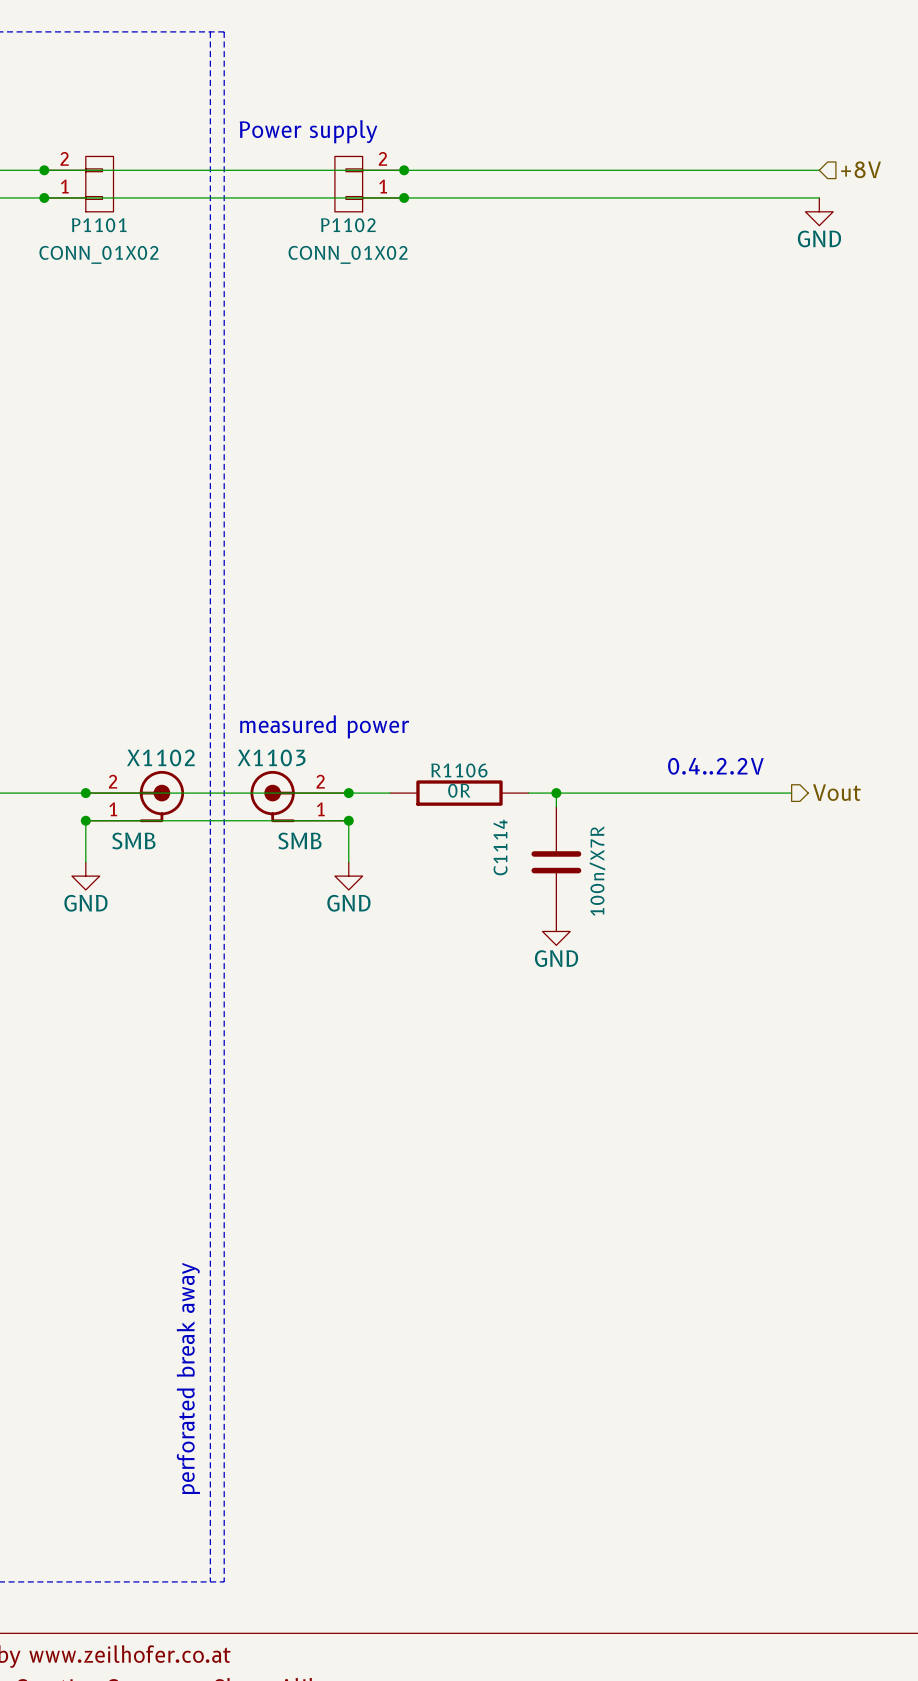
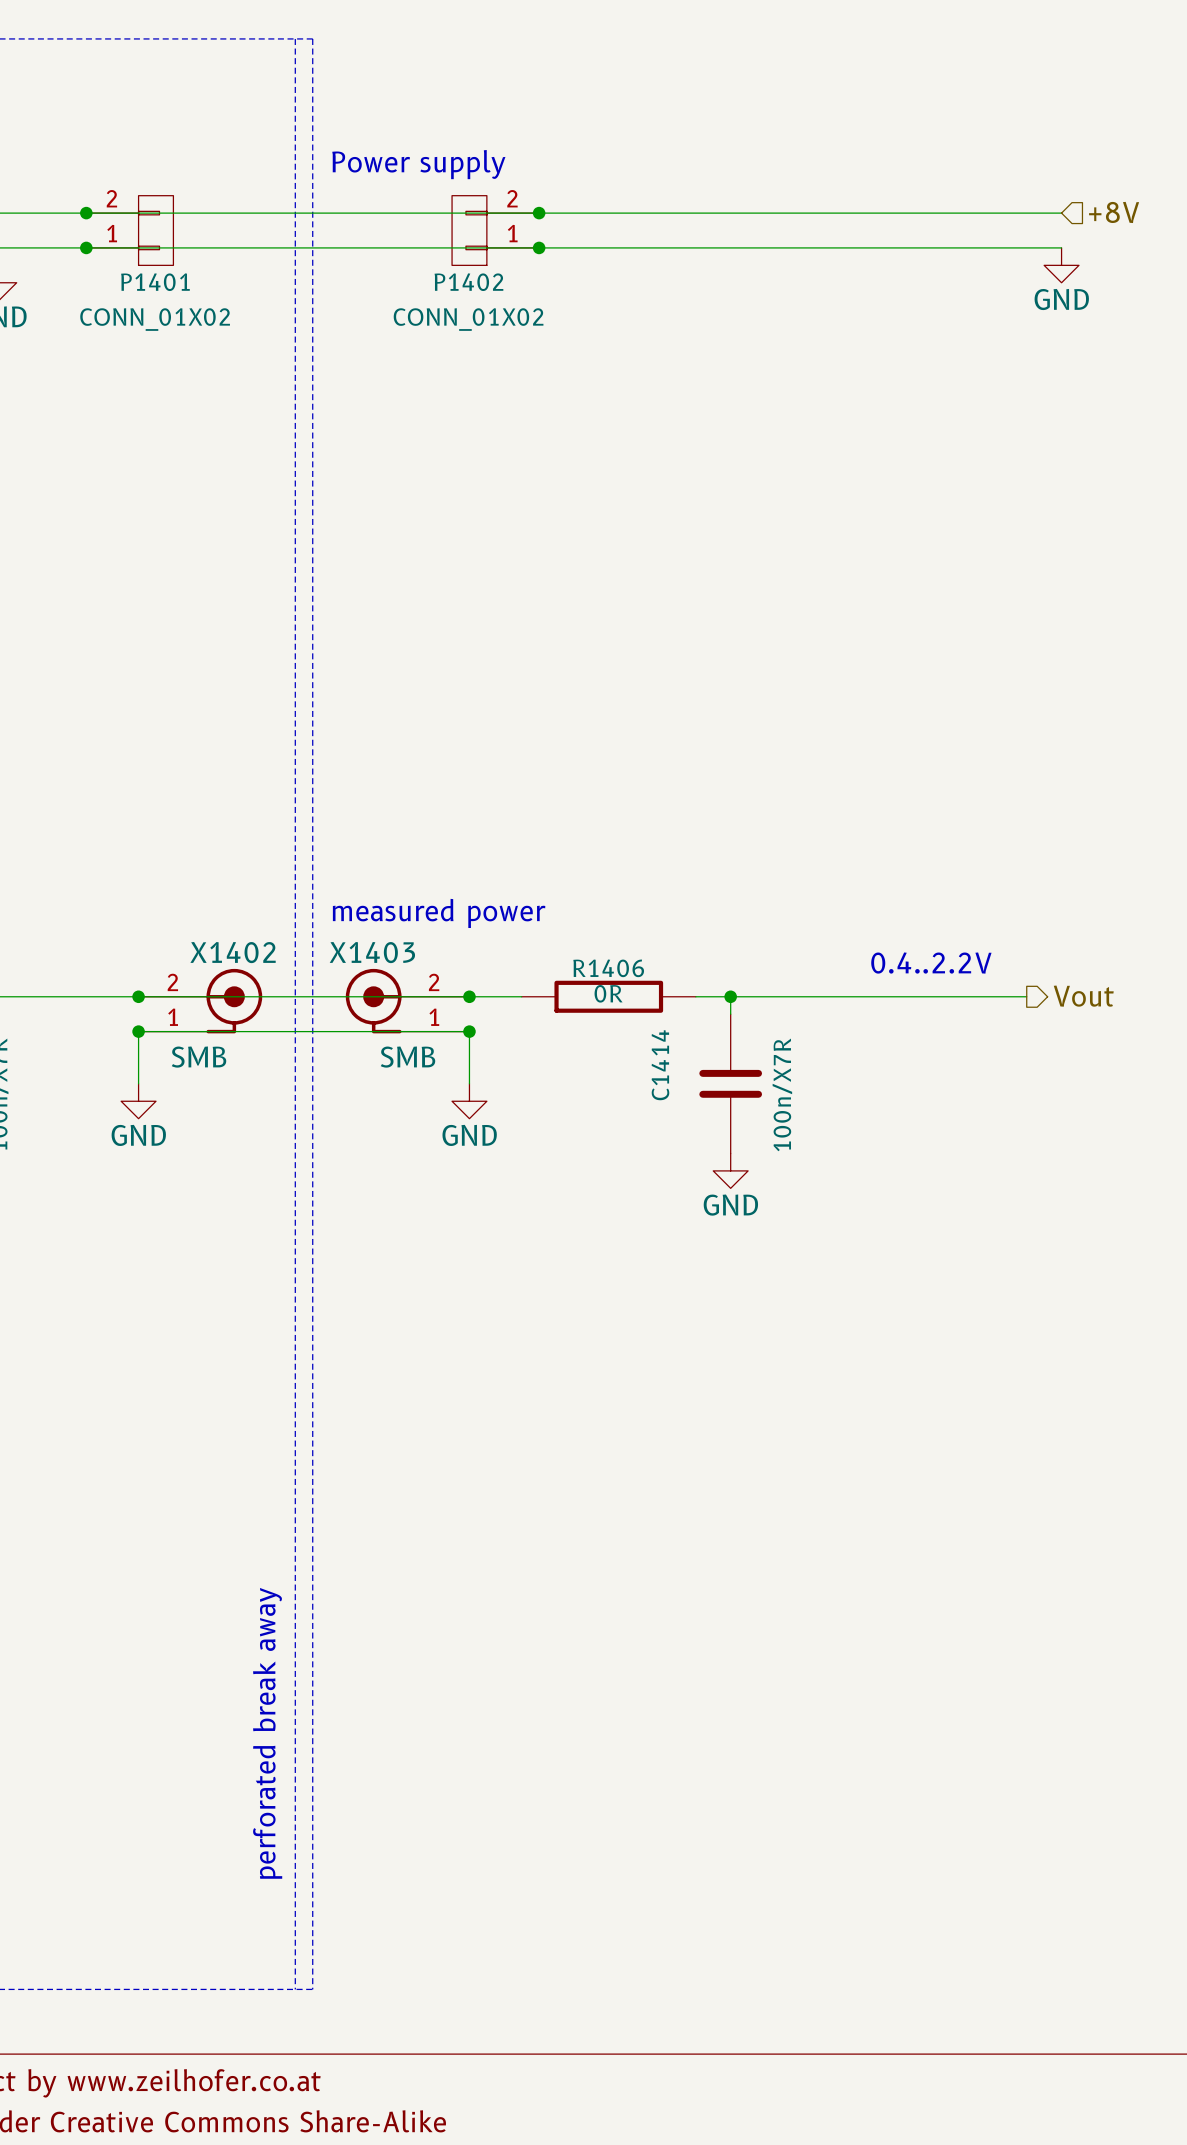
P1101 name: P1101 (99, 225) -> P1401 (155, 282)
P1102 name: P1102 (348, 225) -> P1402 (468, 282)
X1102 name: X1102 (160, 757) -> X1402 (233, 952)
X1103 name: X1103 (271, 757) -> X1403 (372, 952)
R1106 name: R1106 (459, 770) -> R1406 (608, 968)
C1114 name: C1114 (500, 847) -> C1414 (660, 1065)

